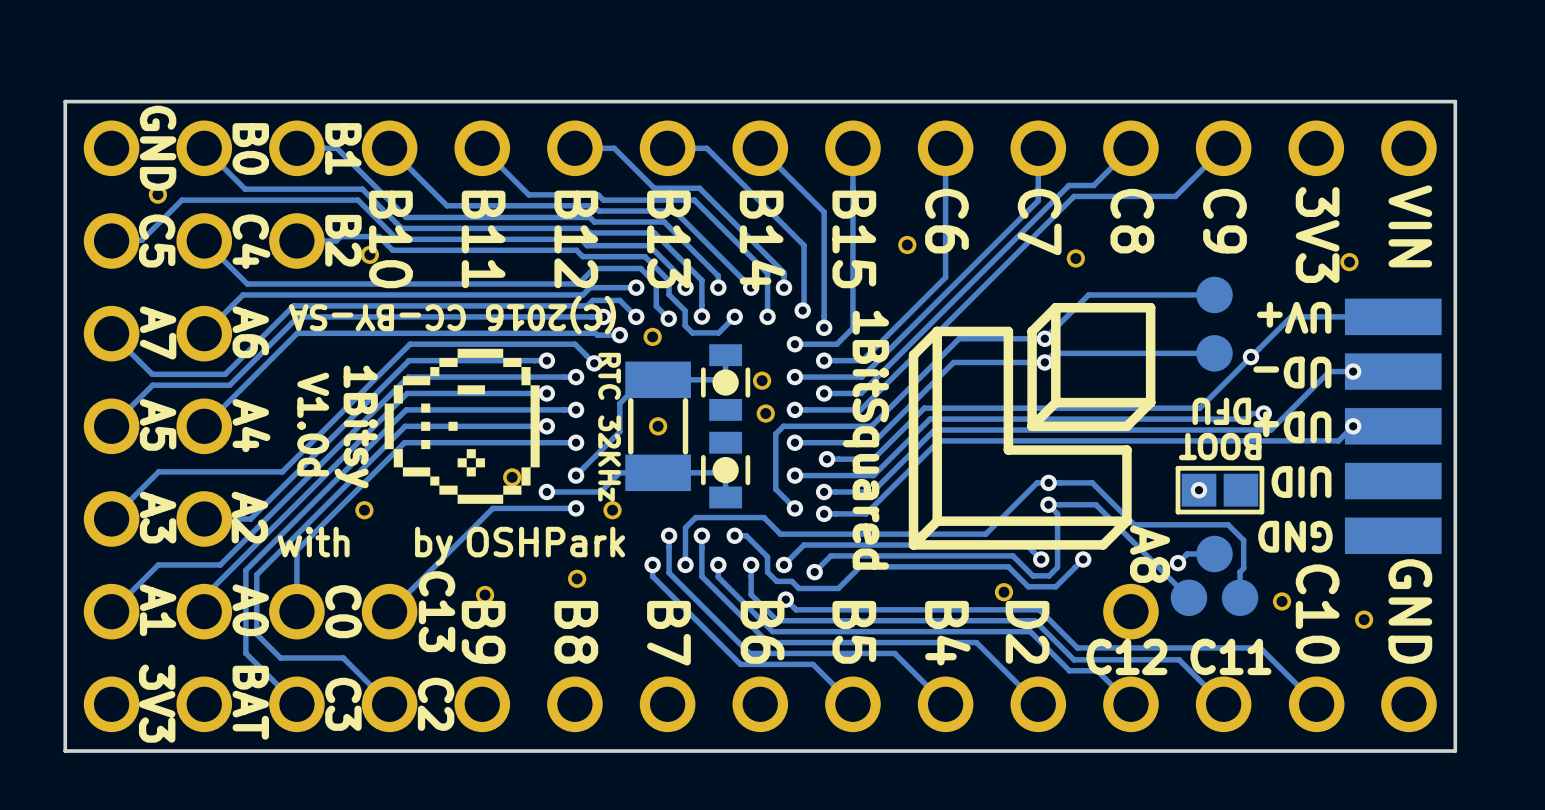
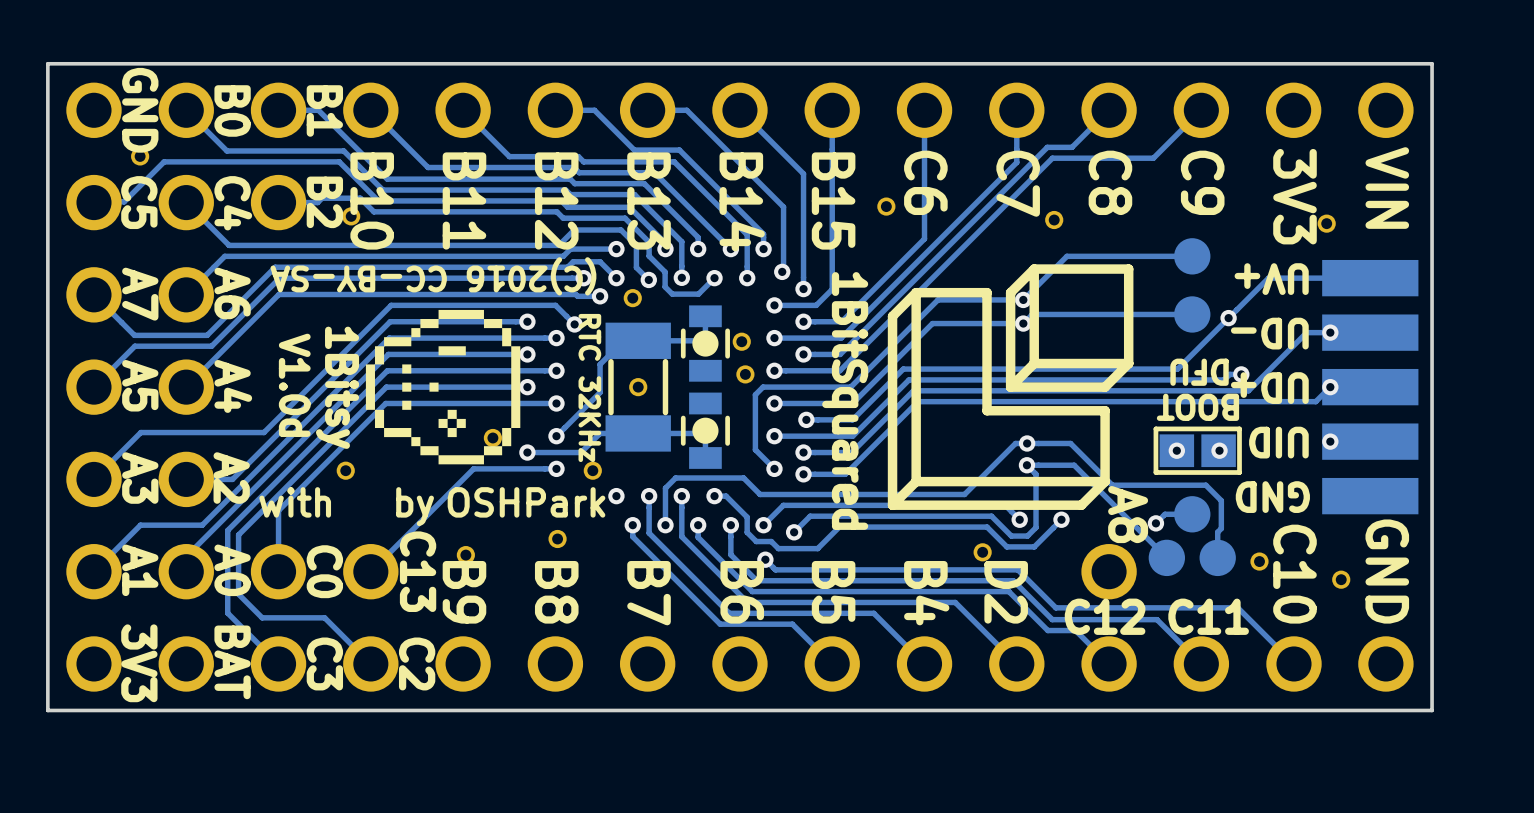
via: none -> (1330, 441)
via: none -> (1219, 450)
via: none -> (616, 496)

